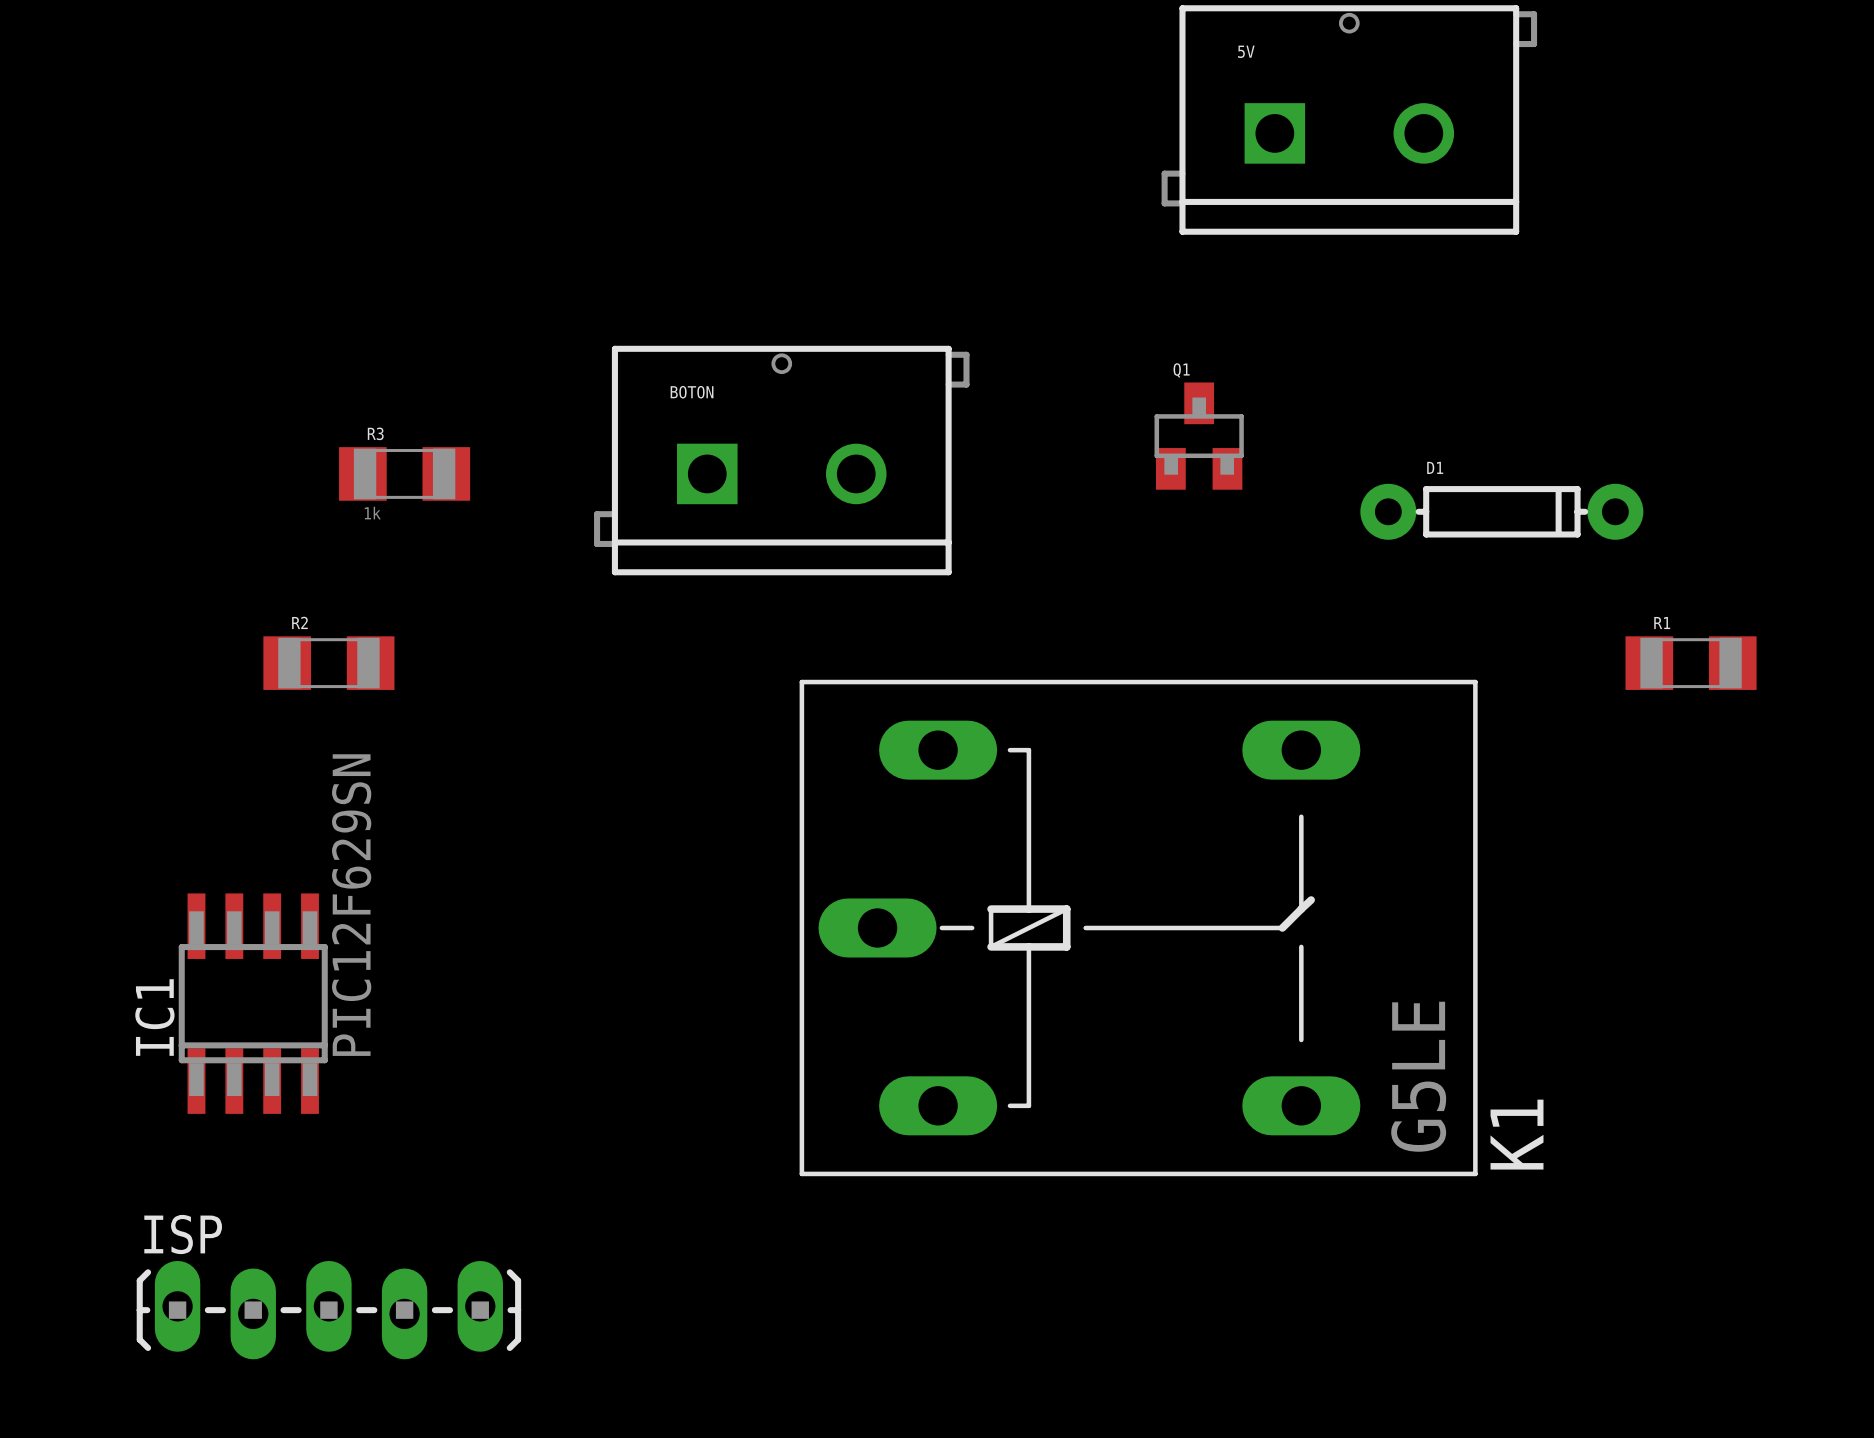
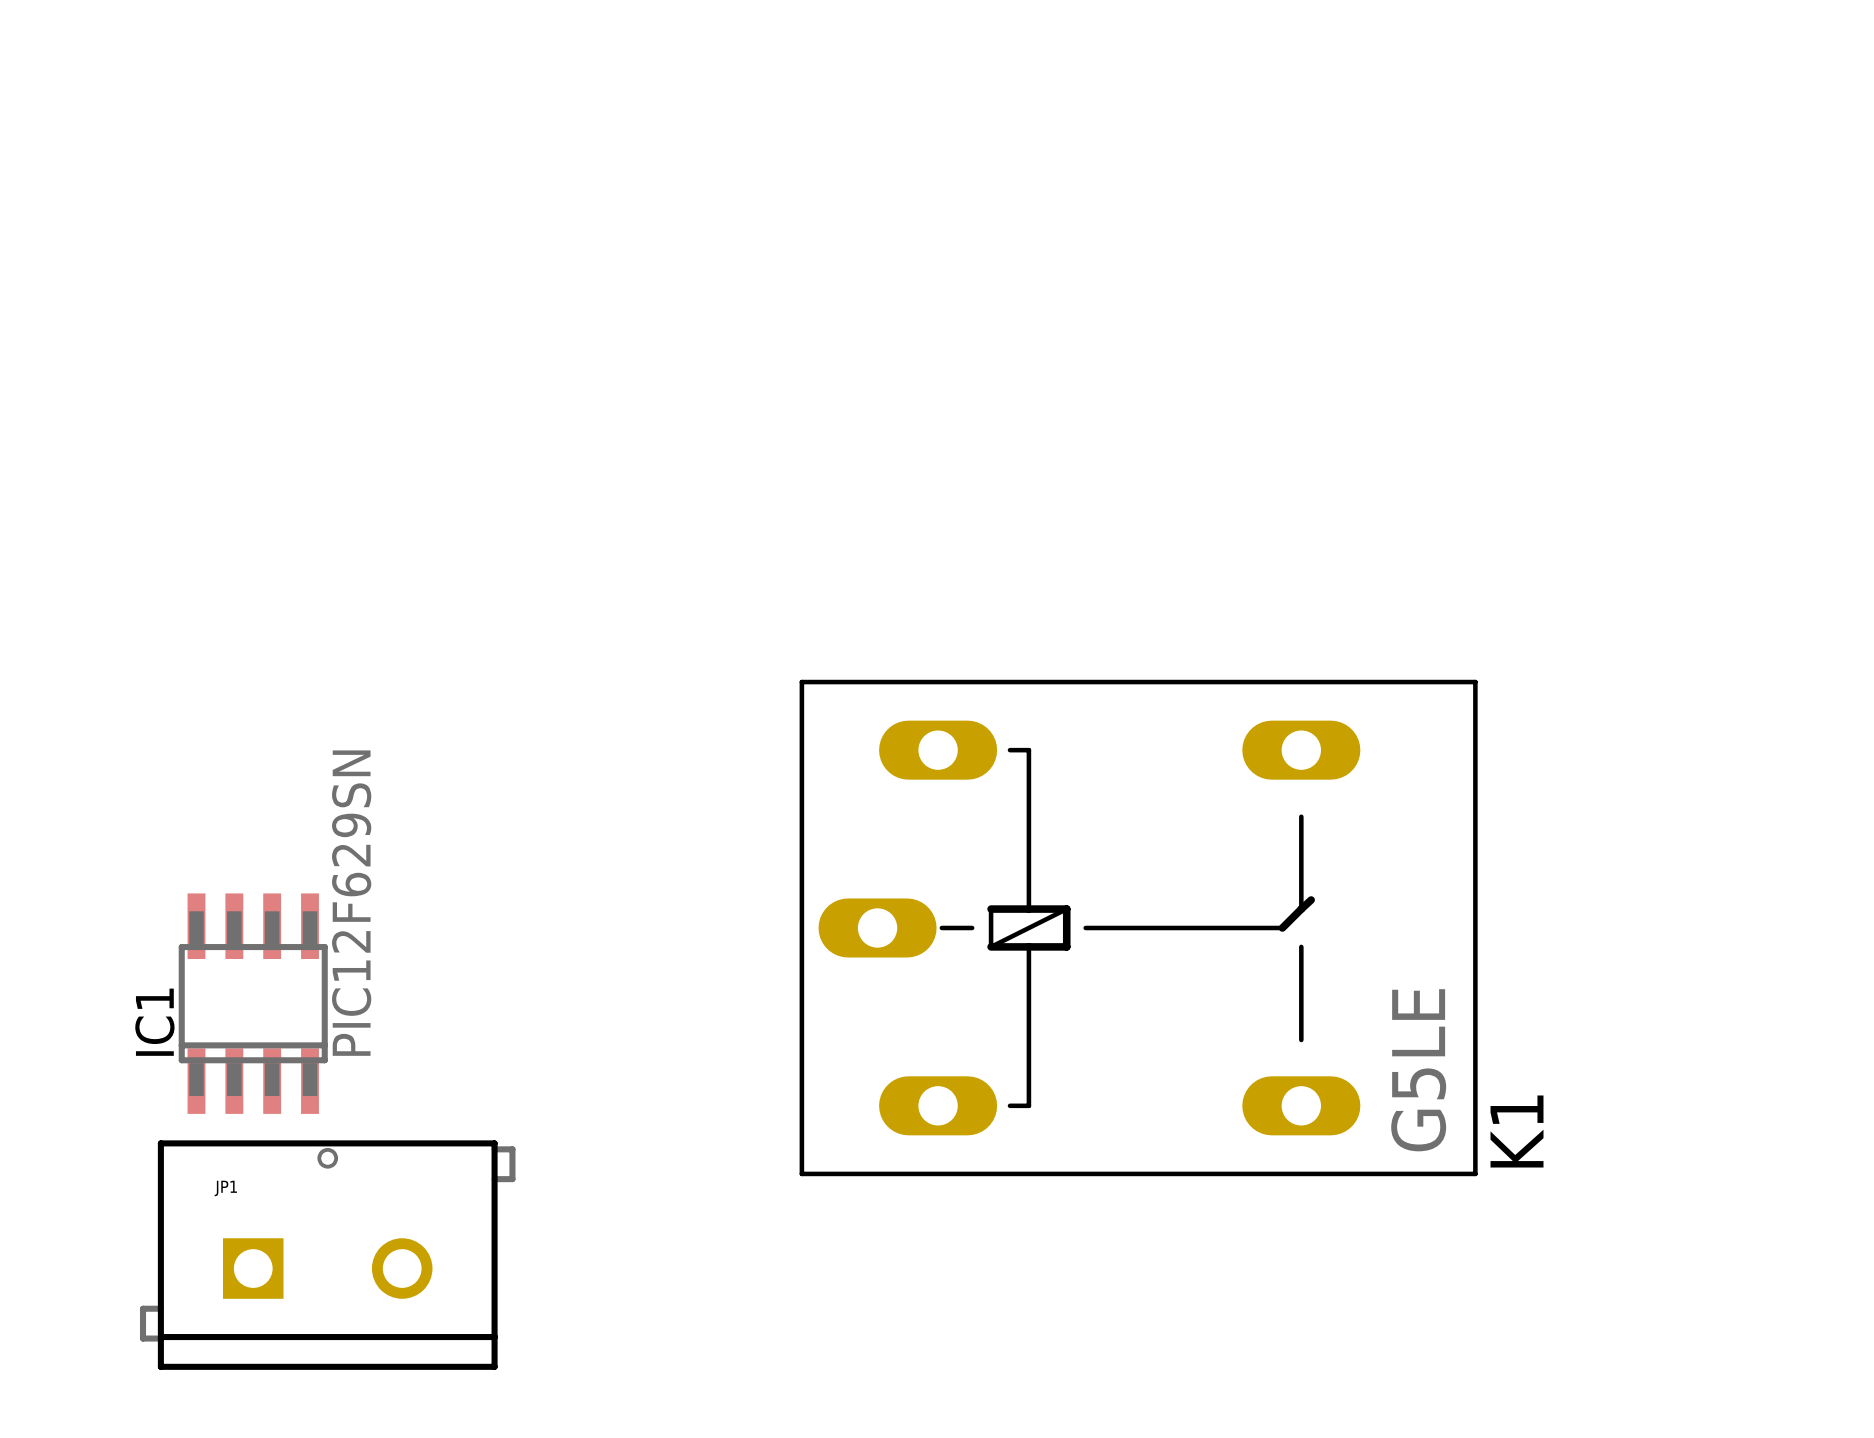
5V: (1349, 120) -> none
Q1: (1199, 436) -> none
BOTON: (781, 460) -> none
R3: 1k (404, 473) -> none
D1: (1501, 511) -> none
R2: (328, 663) -> none
R1: (1691, 663) -> none
JP1: none -> (327, 1255)
ISP: (328, 1310) -> none

